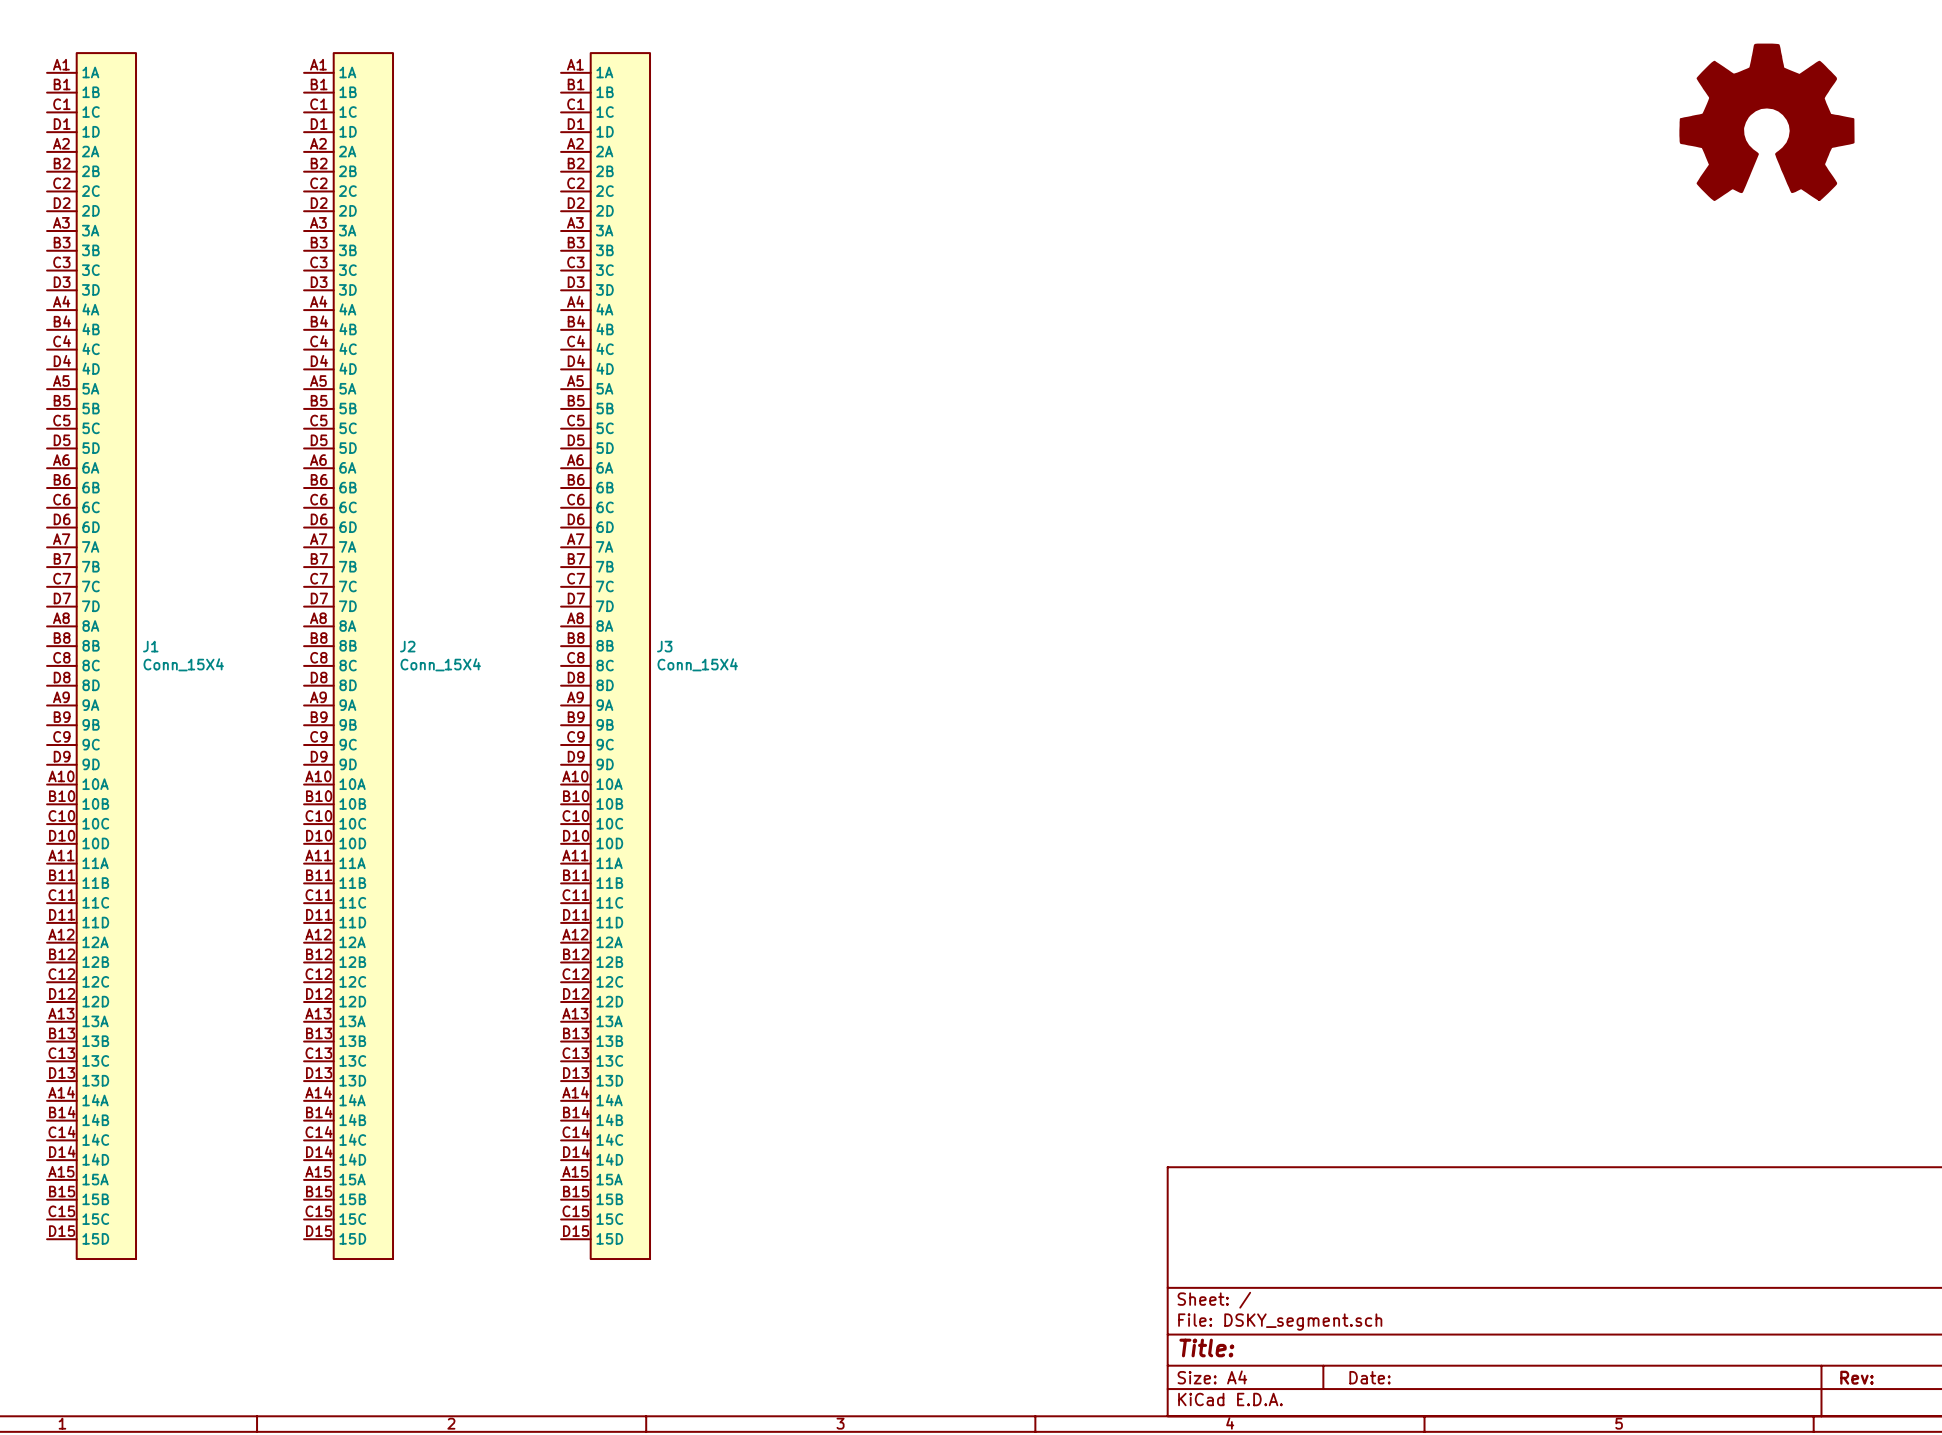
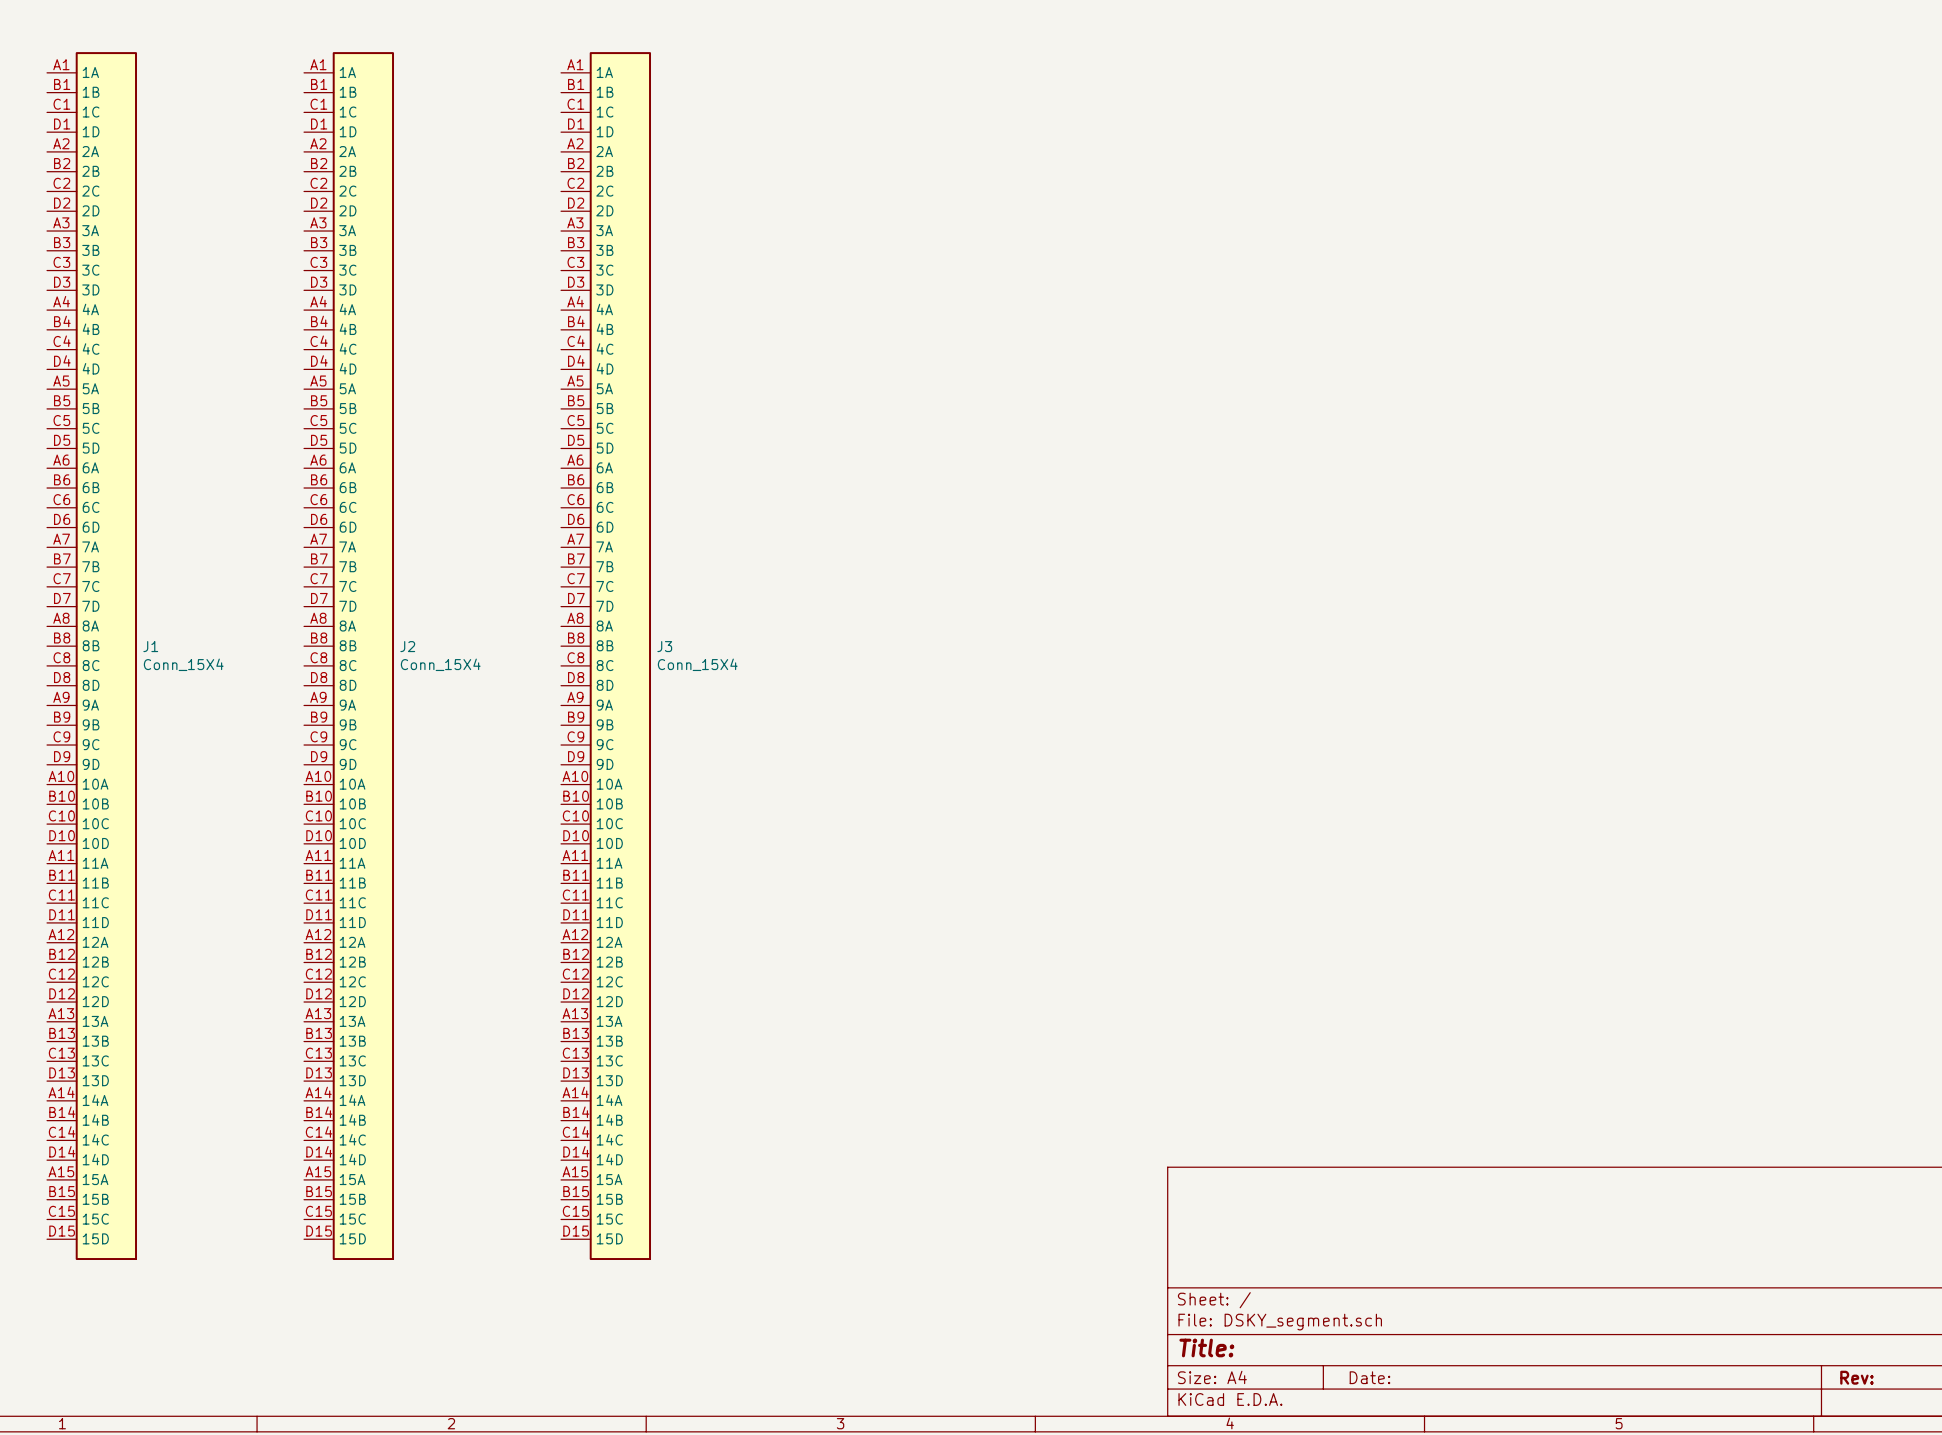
part: (1766, 122) -> none

